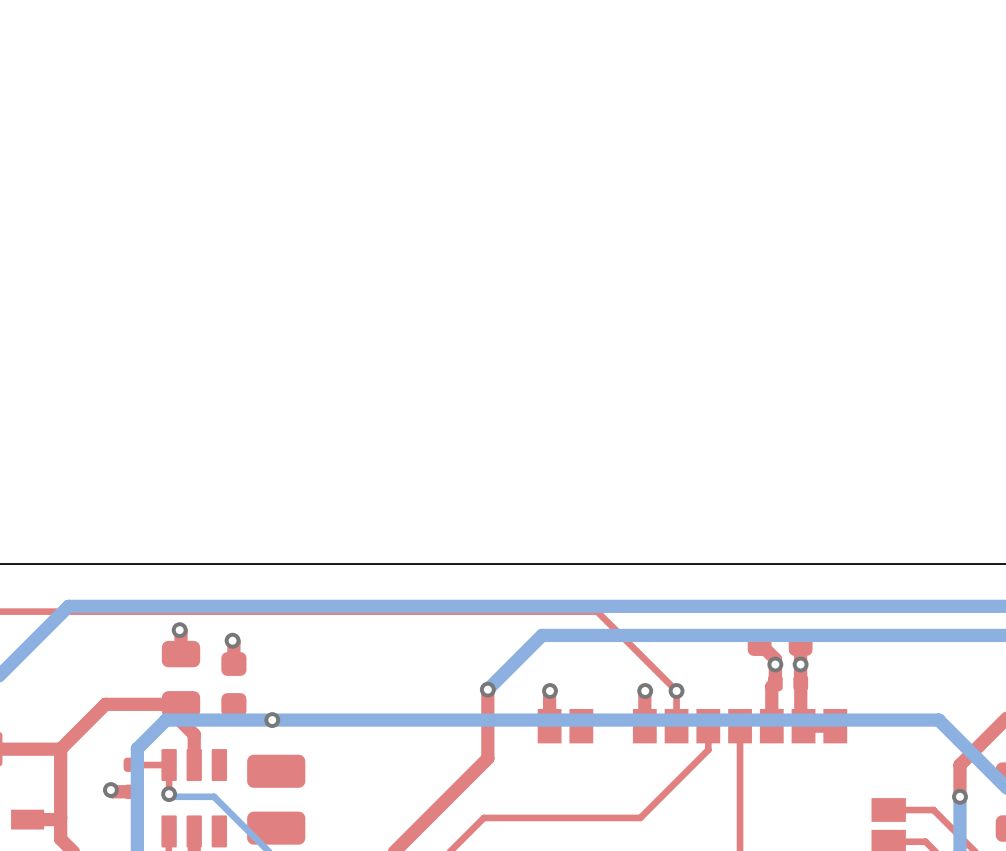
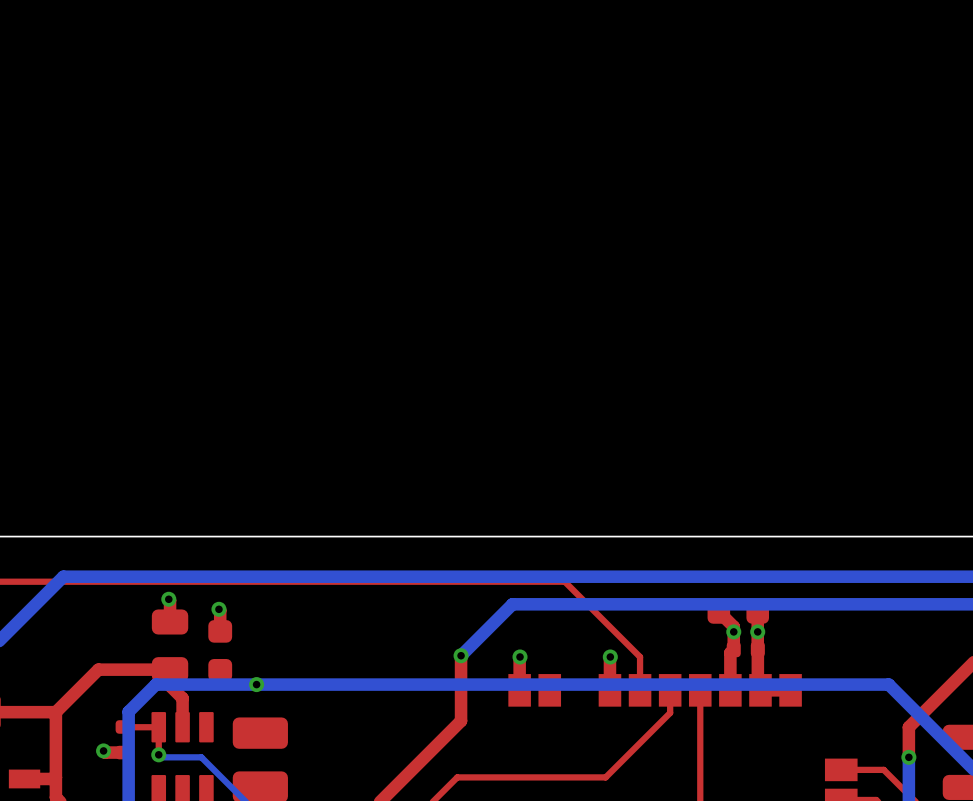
via: (676, 690) -> none

